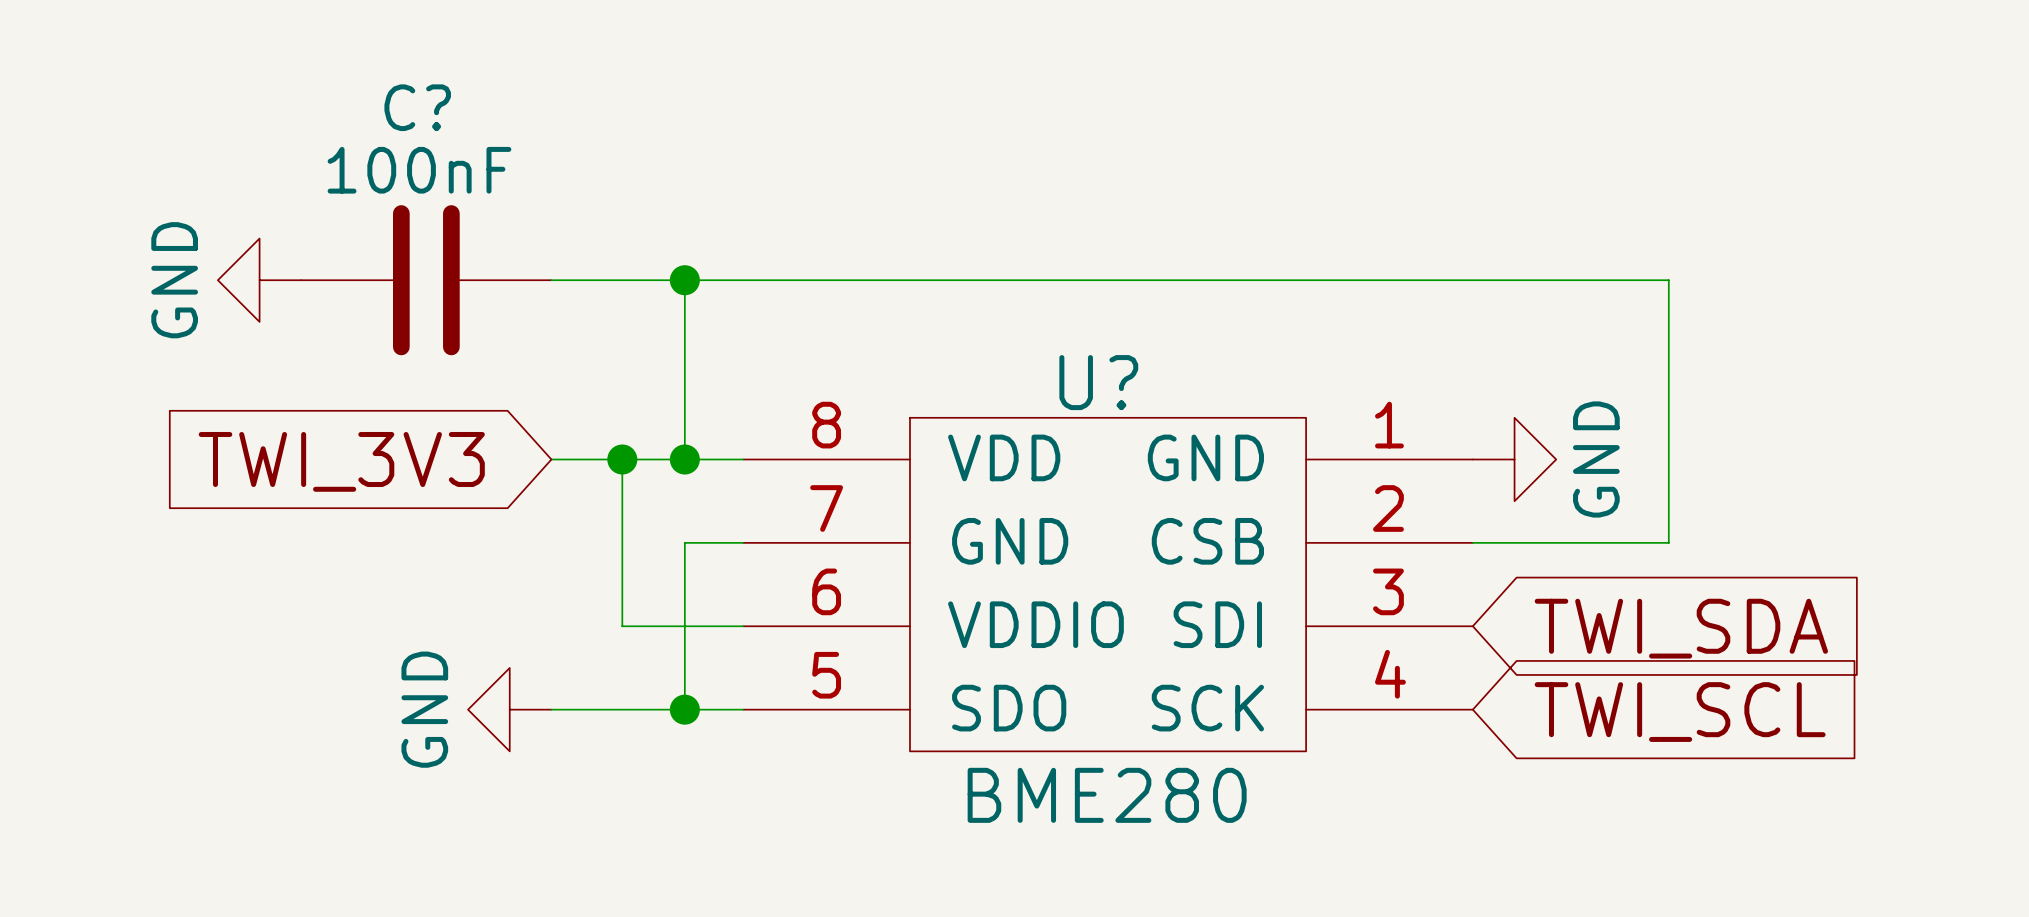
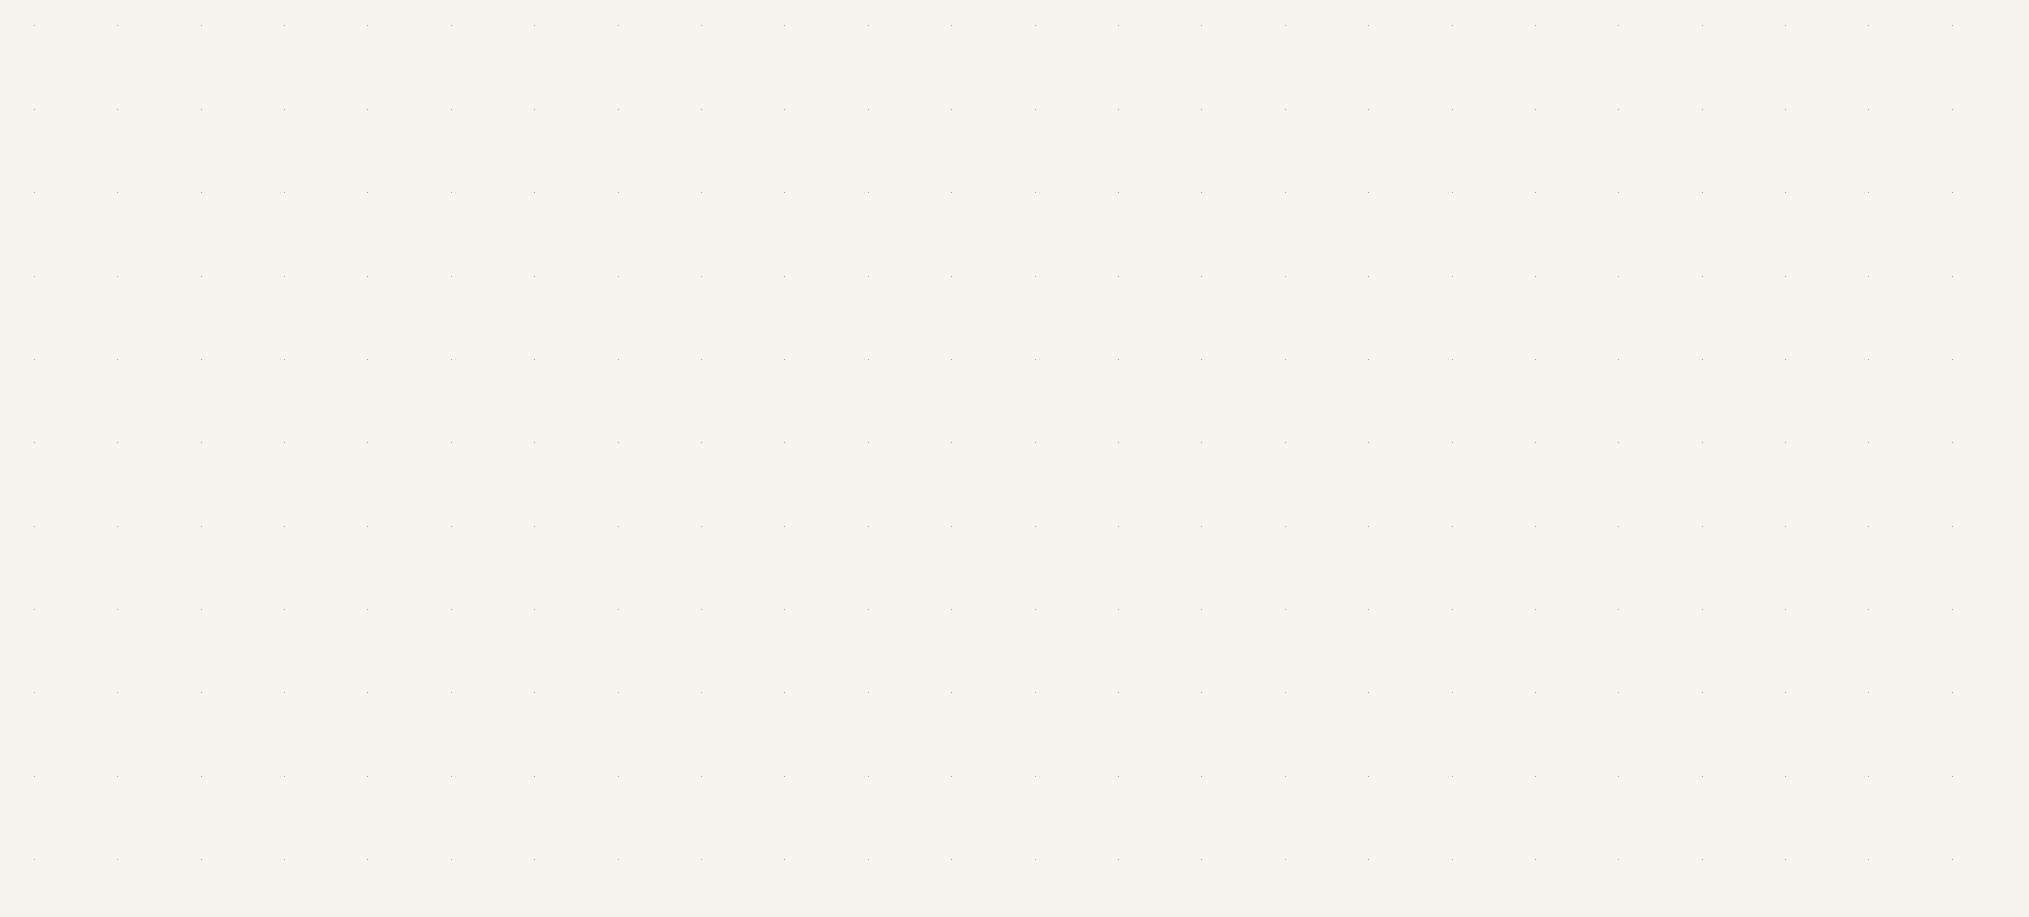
power symbol: GND (259, 280) -> none
C?: 100nF (426, 280) -> none
wire: (551, 280) (1668, 280) (1668, 542) (1472, 542) -> none
wire: (684, 280) (684, 459) -> none
junction: (684, 280) -> none
wire: (551, 459) (743, 459) -> none
wire: (622, 459) (622, 626) (743, 626) -> none
junction: (622, 459) -> none
junction: (684, 459) -> none
power symbol: GND (1514, 459) -> none
global label: TWI_3V3 (341, 461) -> none
wire: (743, 542) (684, 542) (684, 709) -> none
U?: BME280 (1108, 584) -> none
global label: TWI_SDA (1681, 628) -> none
power symbol: GND (509, 709) -> none
wire: (551, 709) (743, 709) -> none
junction: (684, 709) -> none
global label: TWI_SCL (1680, 712) -> none

